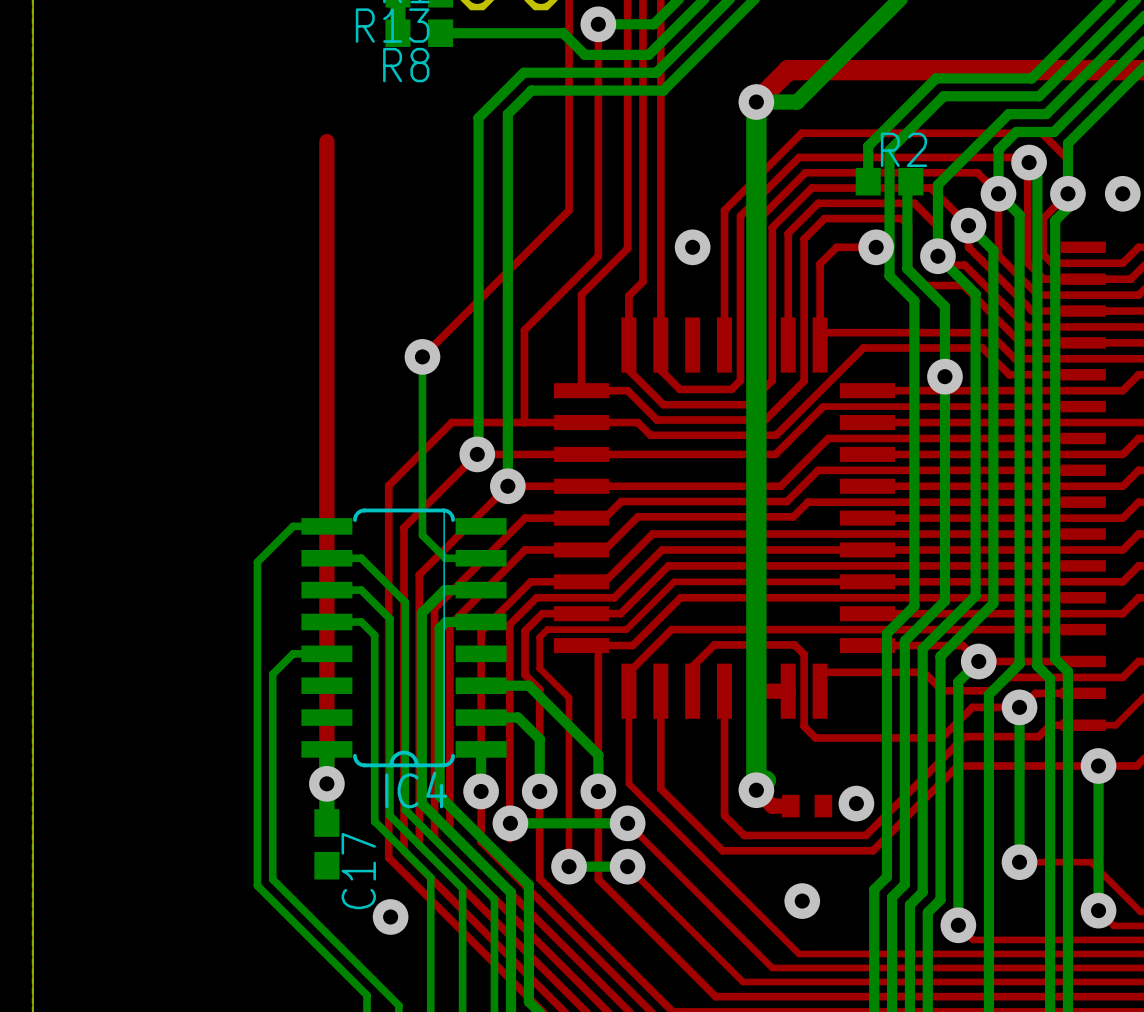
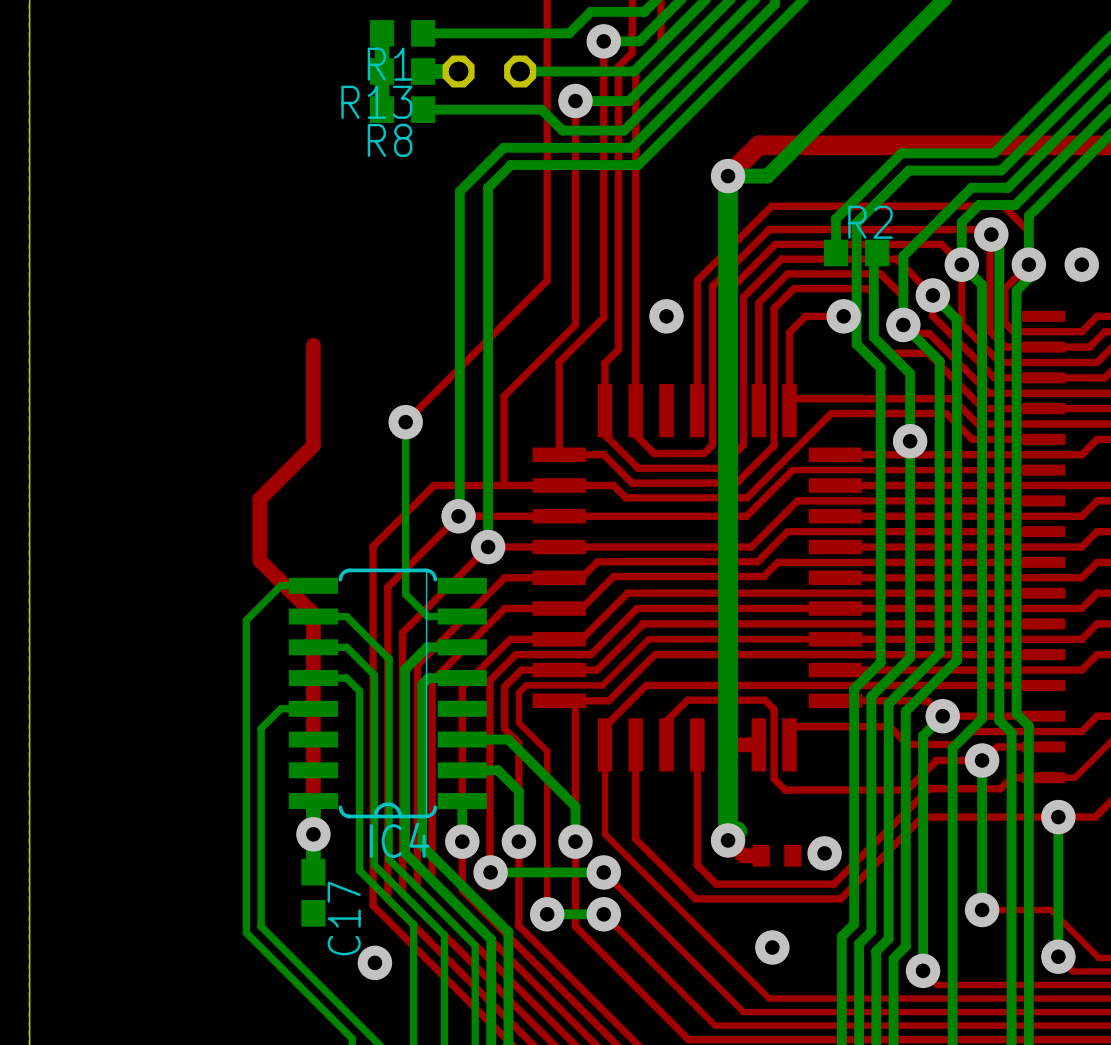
top track: (326, 141) (326, 277) -> none
top track: (326, 381) (326, 555) -> (313, 445) (259, 499) (259, 560) (313, 614)

